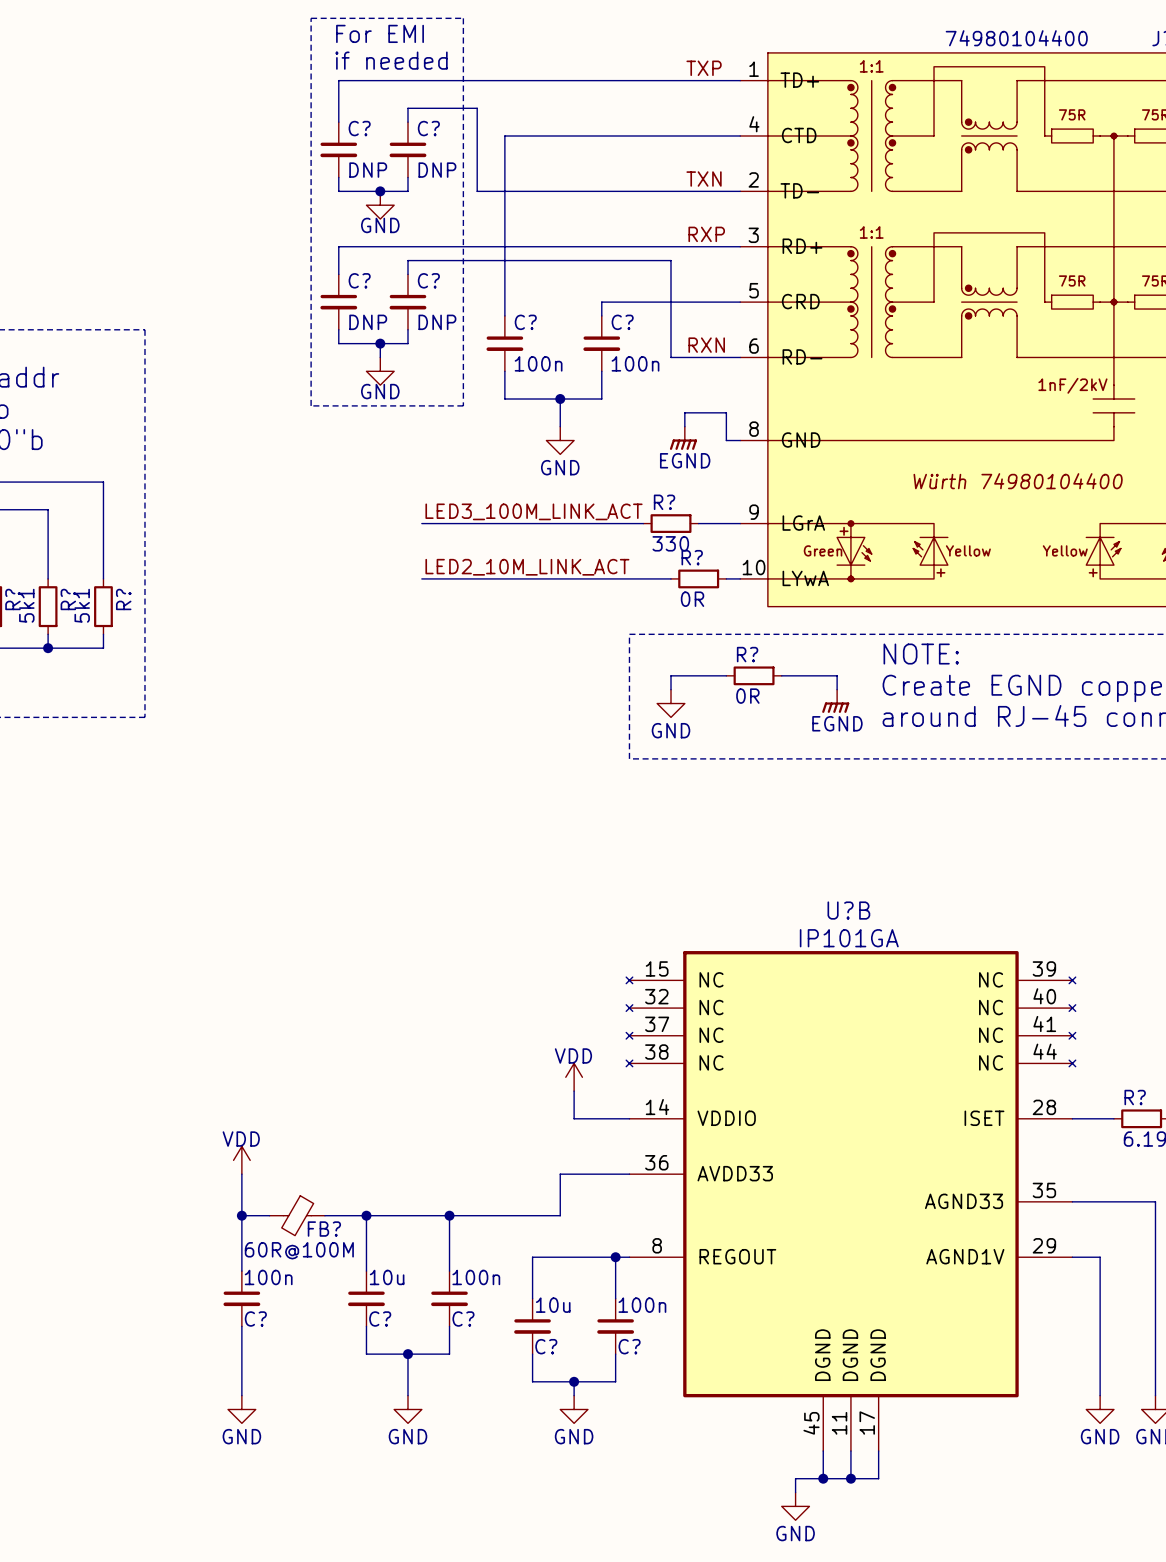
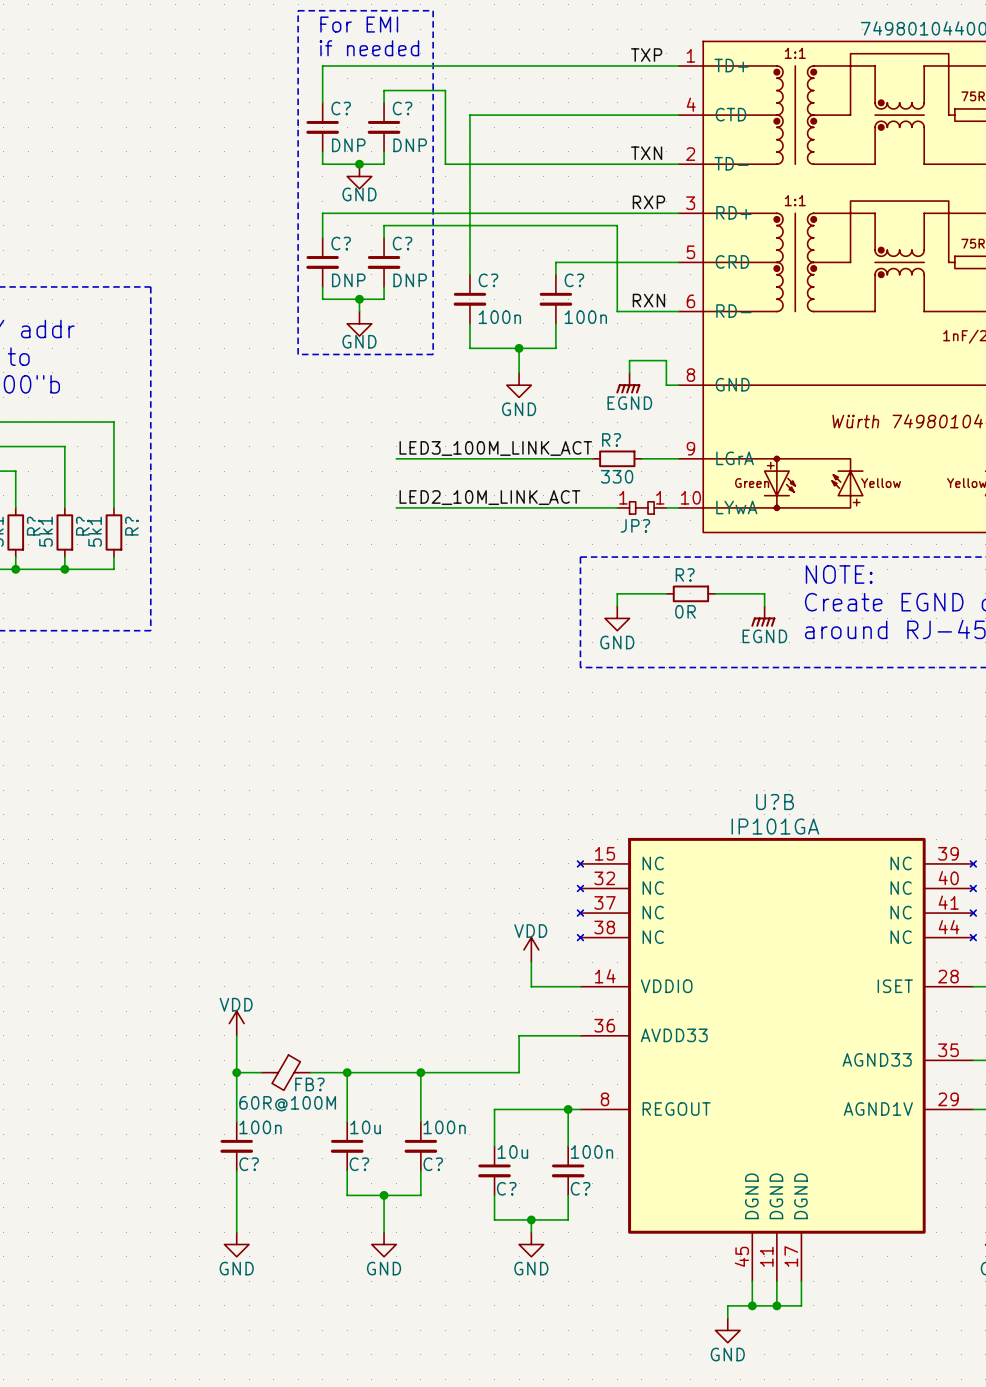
R?: 0R (698, 578) -> none
JP?: none -> (641, 507)

